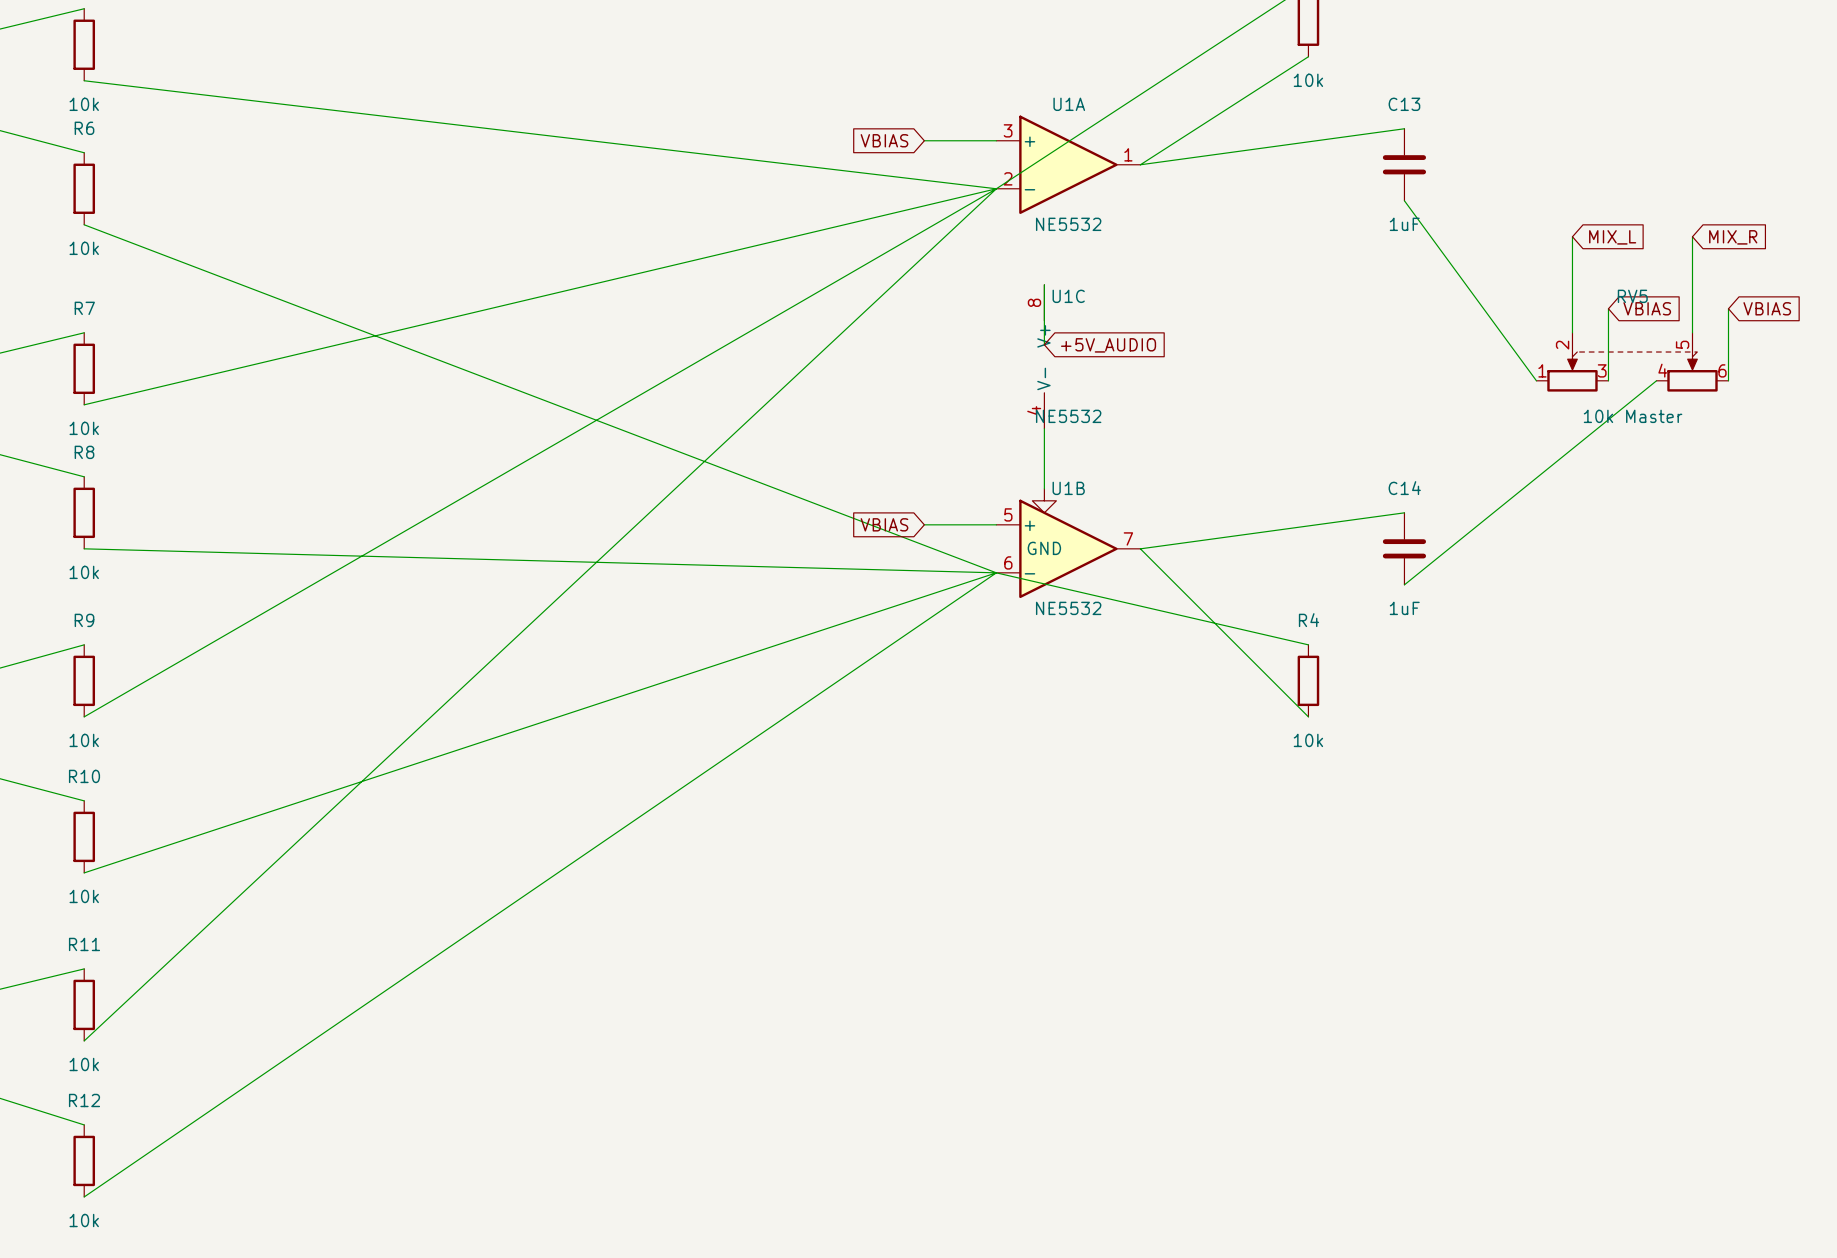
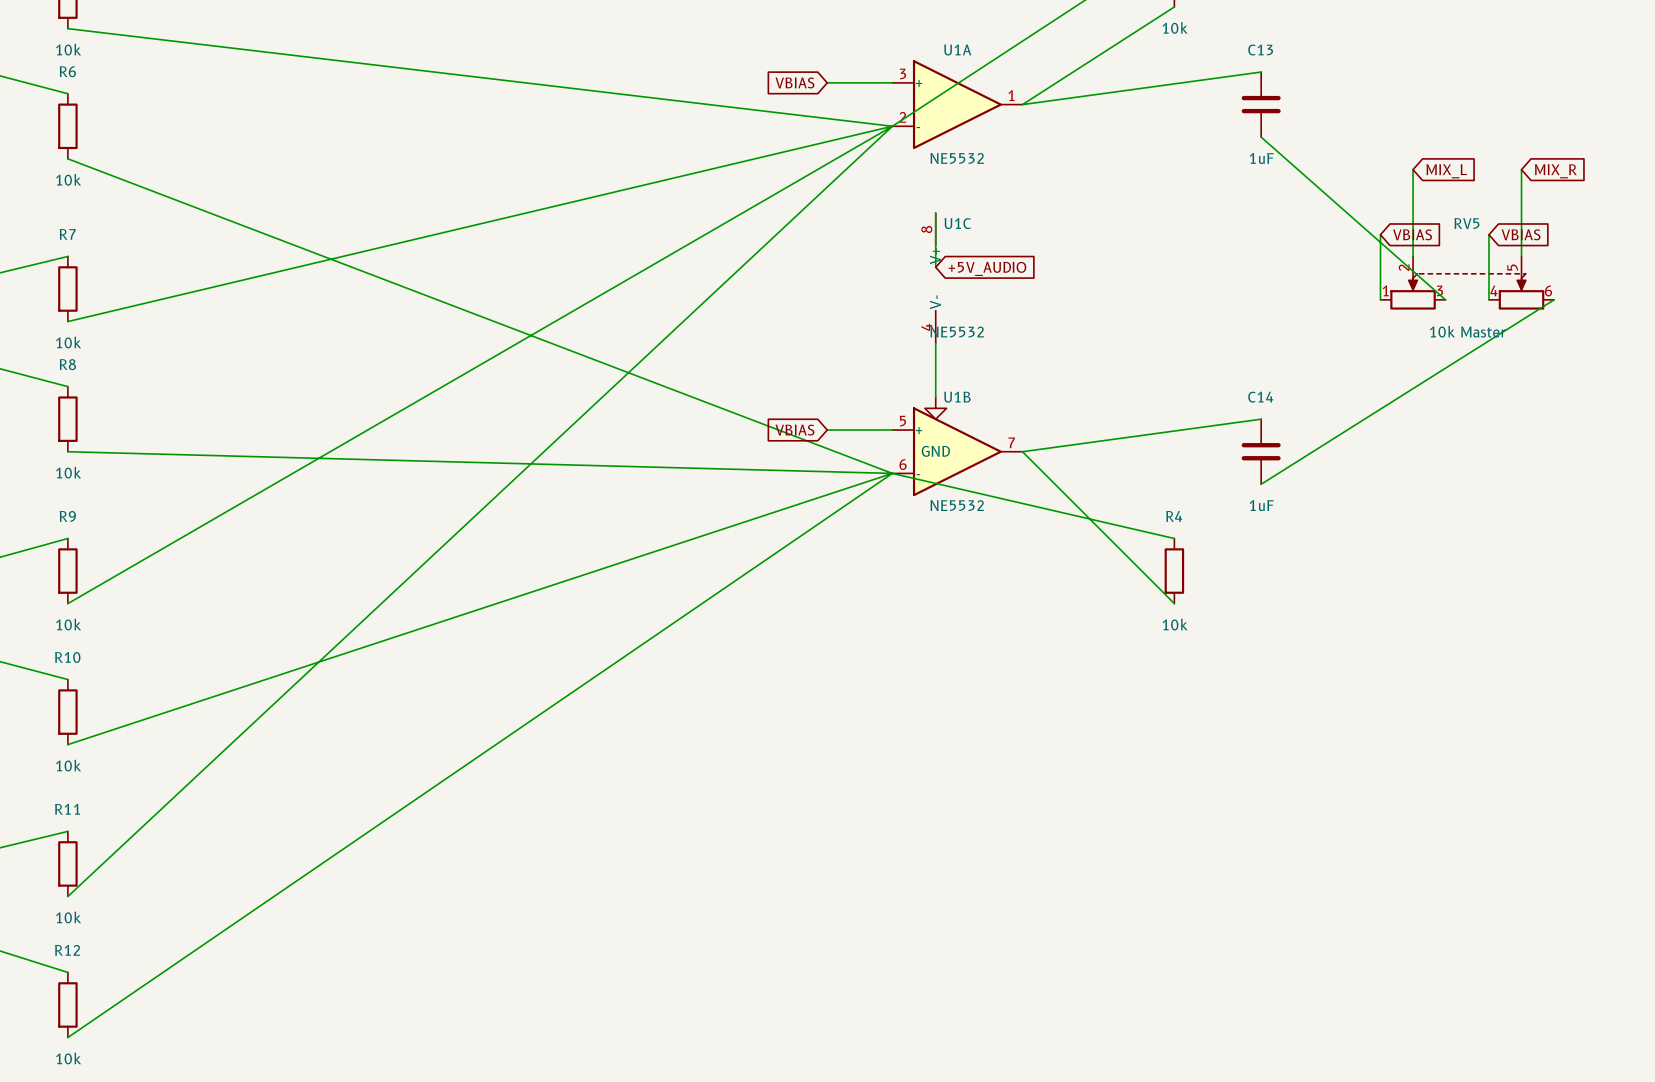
wire: (1404, 200) (1536, 380) -> (1261, 137) (1445, 299)
global label: none -> VBIAS (1412, 234)
wire: (1608, 308) (1608, 380) -> (1488, 234) (1488, 299)
global label: VBIAS (1647, 308) -> none
global label: none -> VBIAS (1521, 234)
wire: (1728, 308) (1728, 380) -> (1380, 234) (1380, 299)
global label: VBIAS (1767, 308) -> none
wire: (1656, 380) (1404, 584) -> (1554, 299) (1261, 484)

